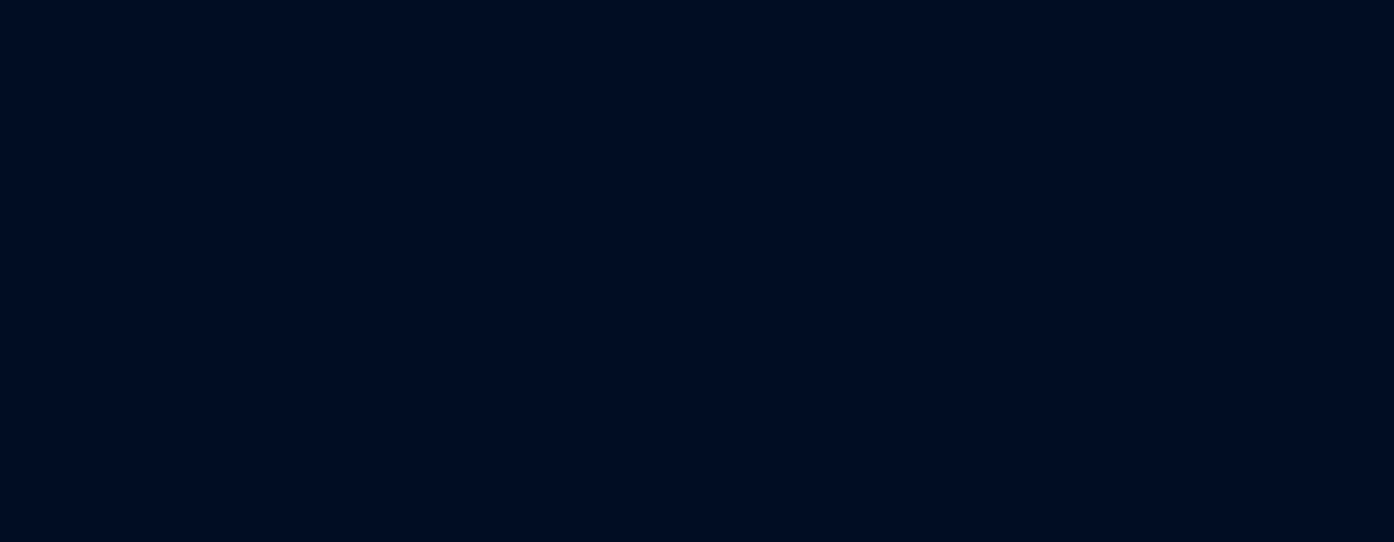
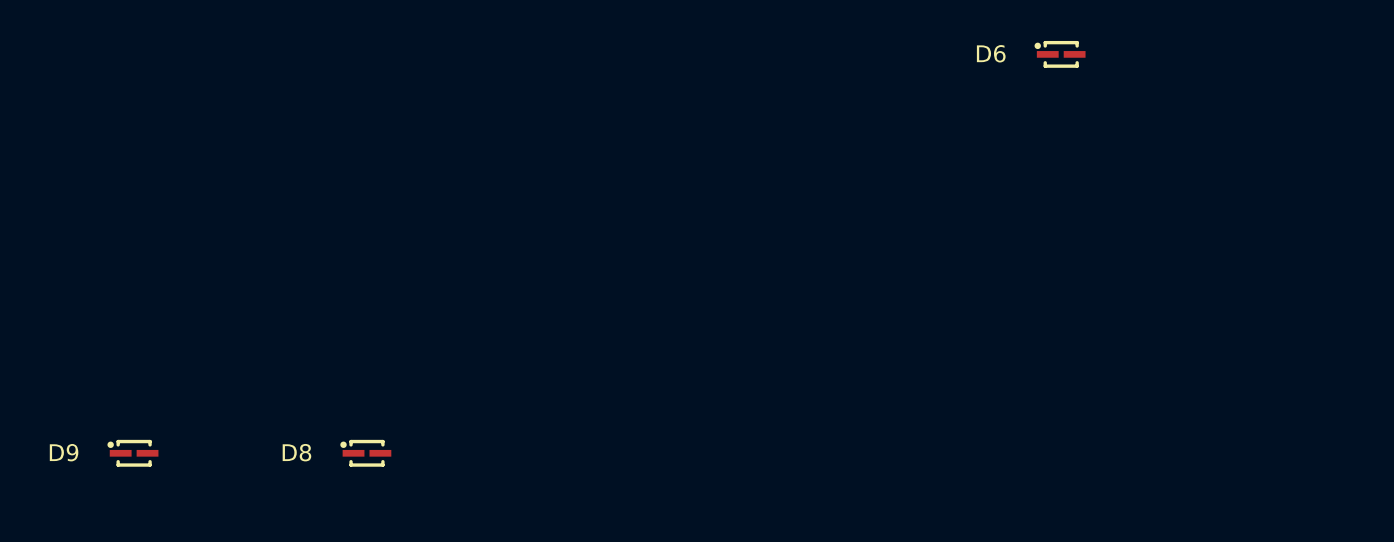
D6: none -> (1060, 54)
D9: none -> (132, 453)
D8: none -> (365, 453)

